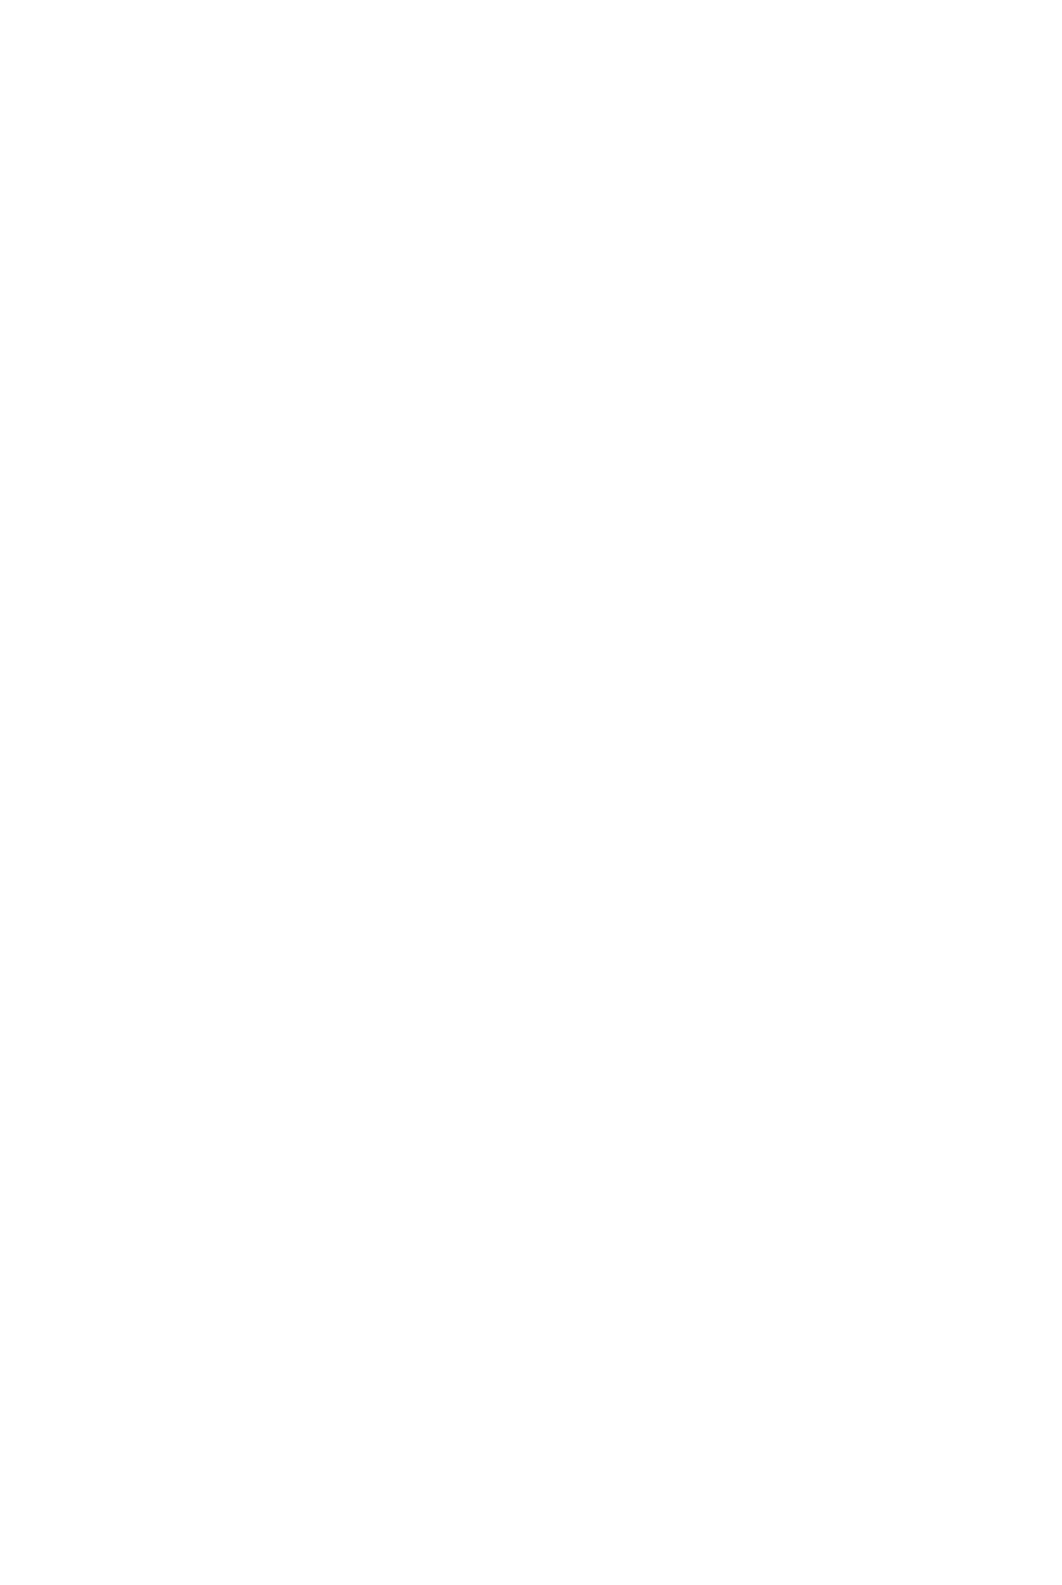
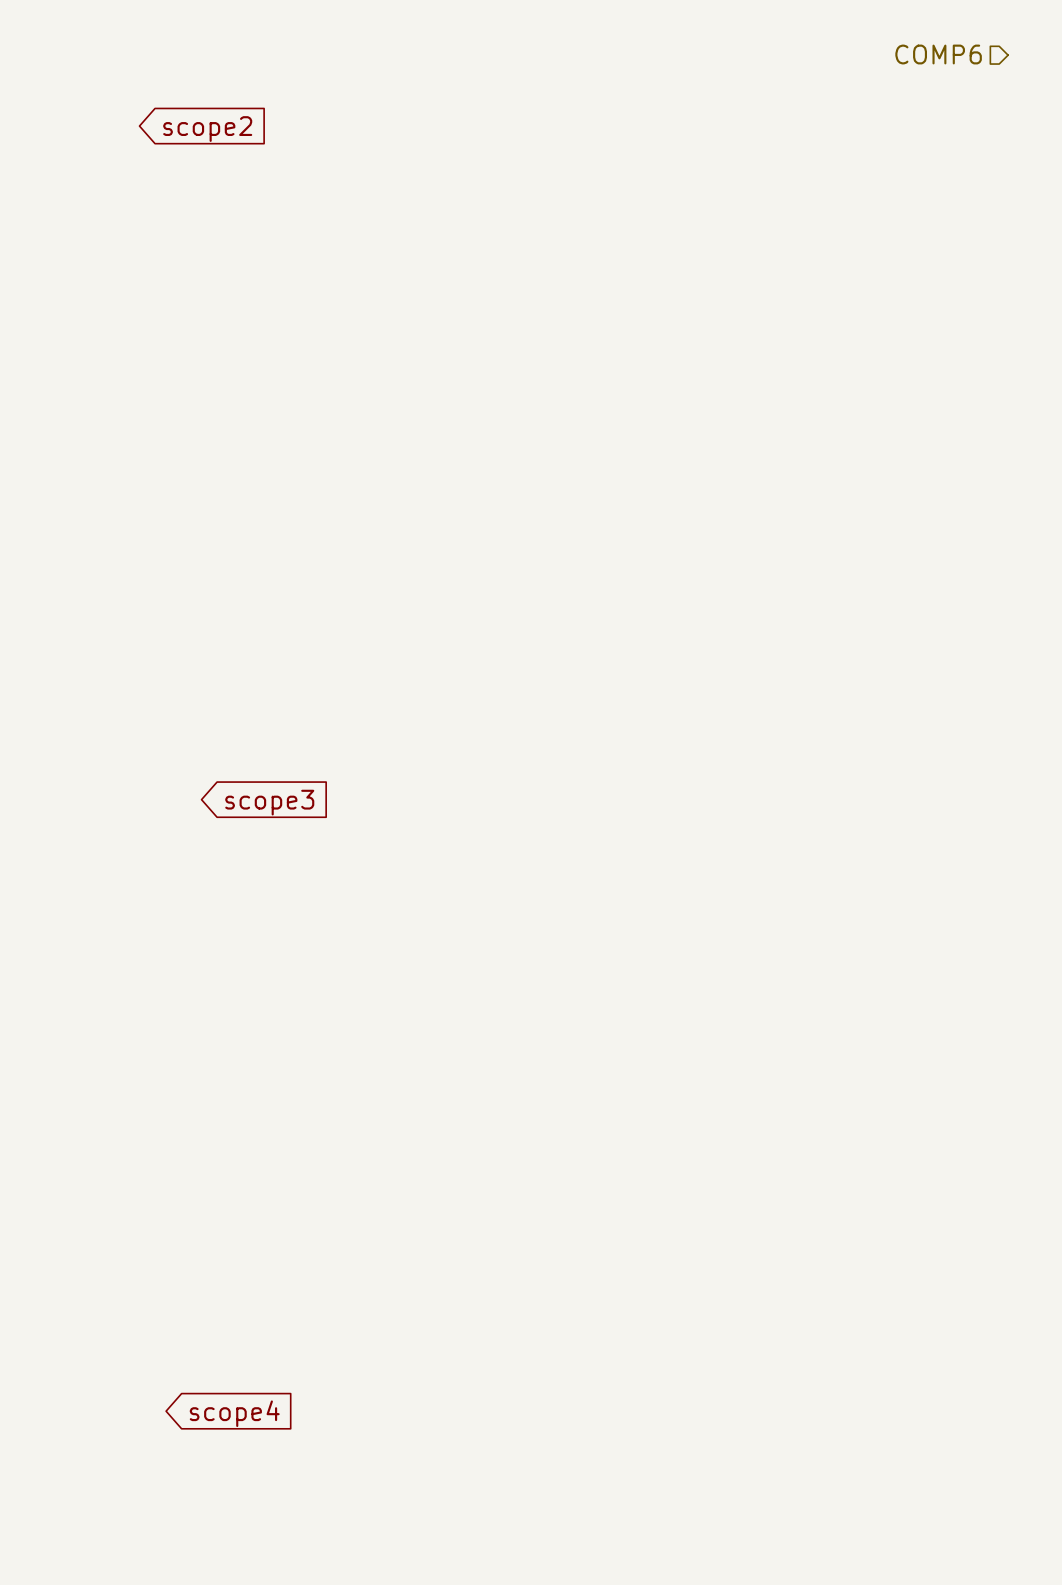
hierarchical label: none -> COMP6 (938, 54)
global label: none -> scope2 (207, 129)
global label: none -> scope3 (269, 802)
global label: none -> scope4 (234, 1413)

